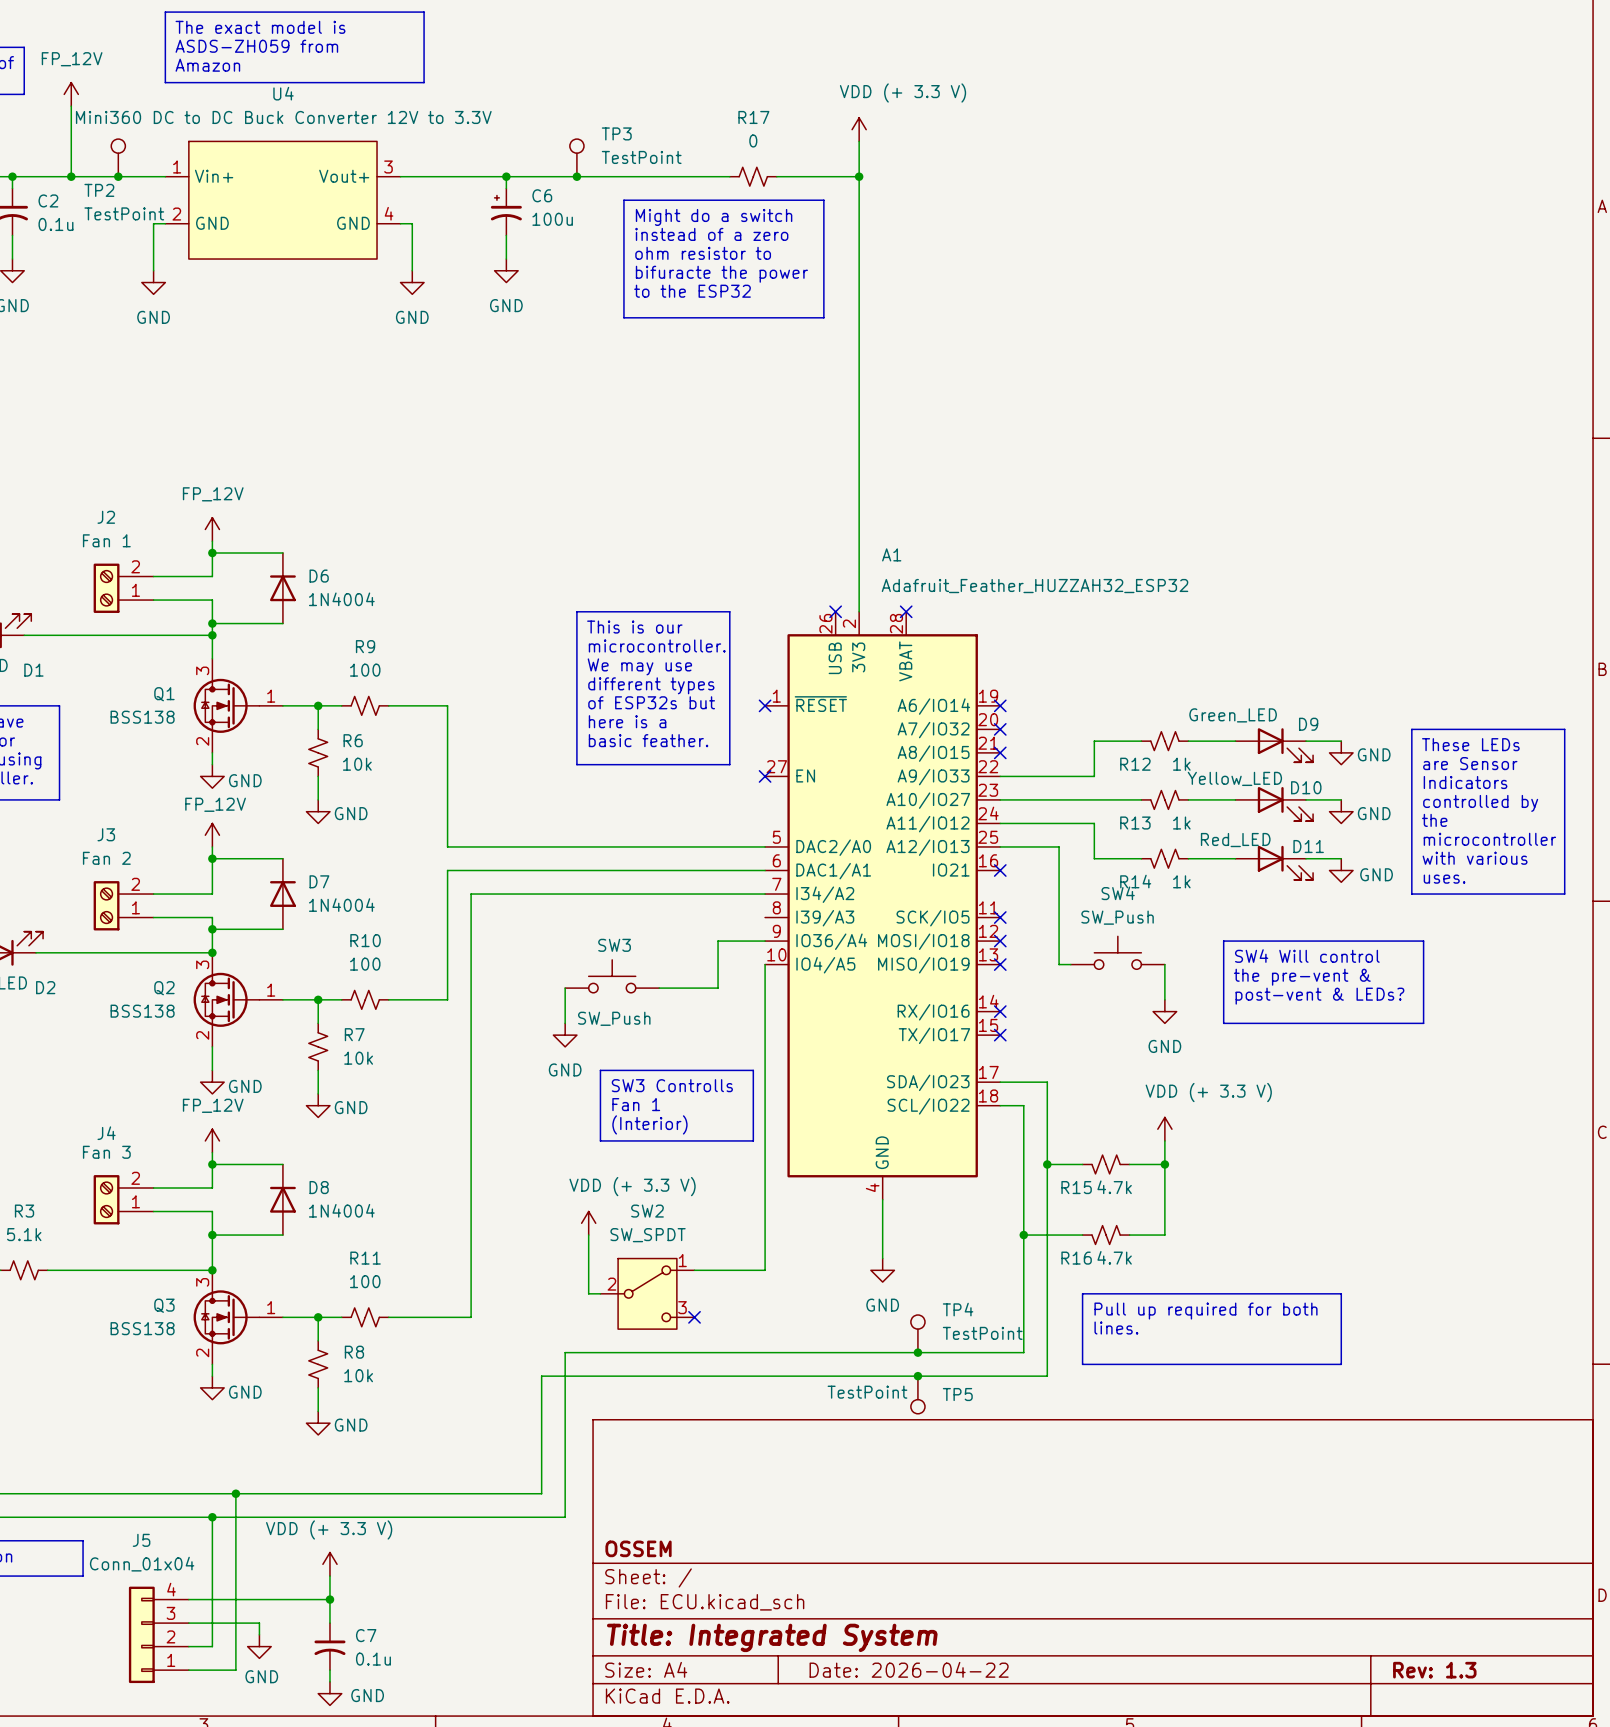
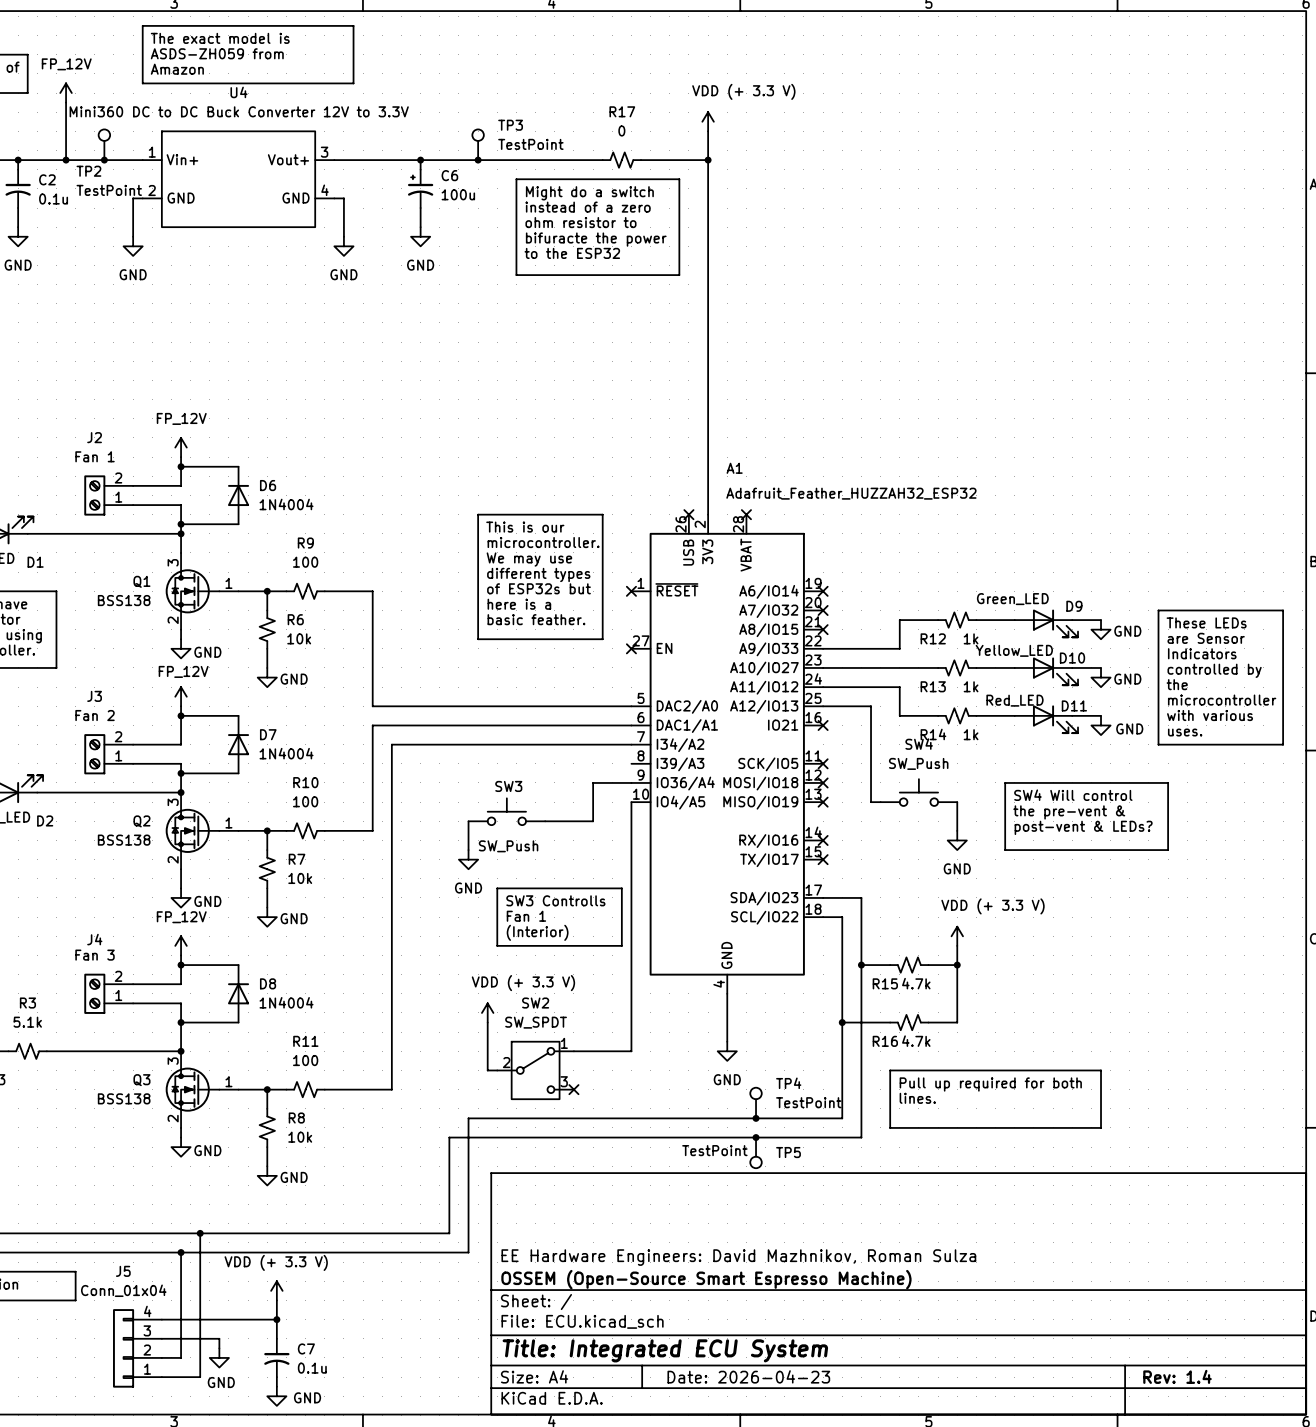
title block: none -> EE Hardware Engineers: David Mazhnikov, Roman Sulza (738, 1257)
title block: OSSEM (638, 1548) -> OSSEM (Open-Source Smart Espresso Machine) (706, 1279)
title block: Title: Integrated System (772, 1637) -> Title: Integrated ECU System (665, 1350)
title block: Date: 2026-04-22 (909, 1669) -> Date: 2026-04-23 (748, 1376)
title block: Rev: 1.3 (1434, 1670) -> Rev: 1.4 (1177, 1376)

